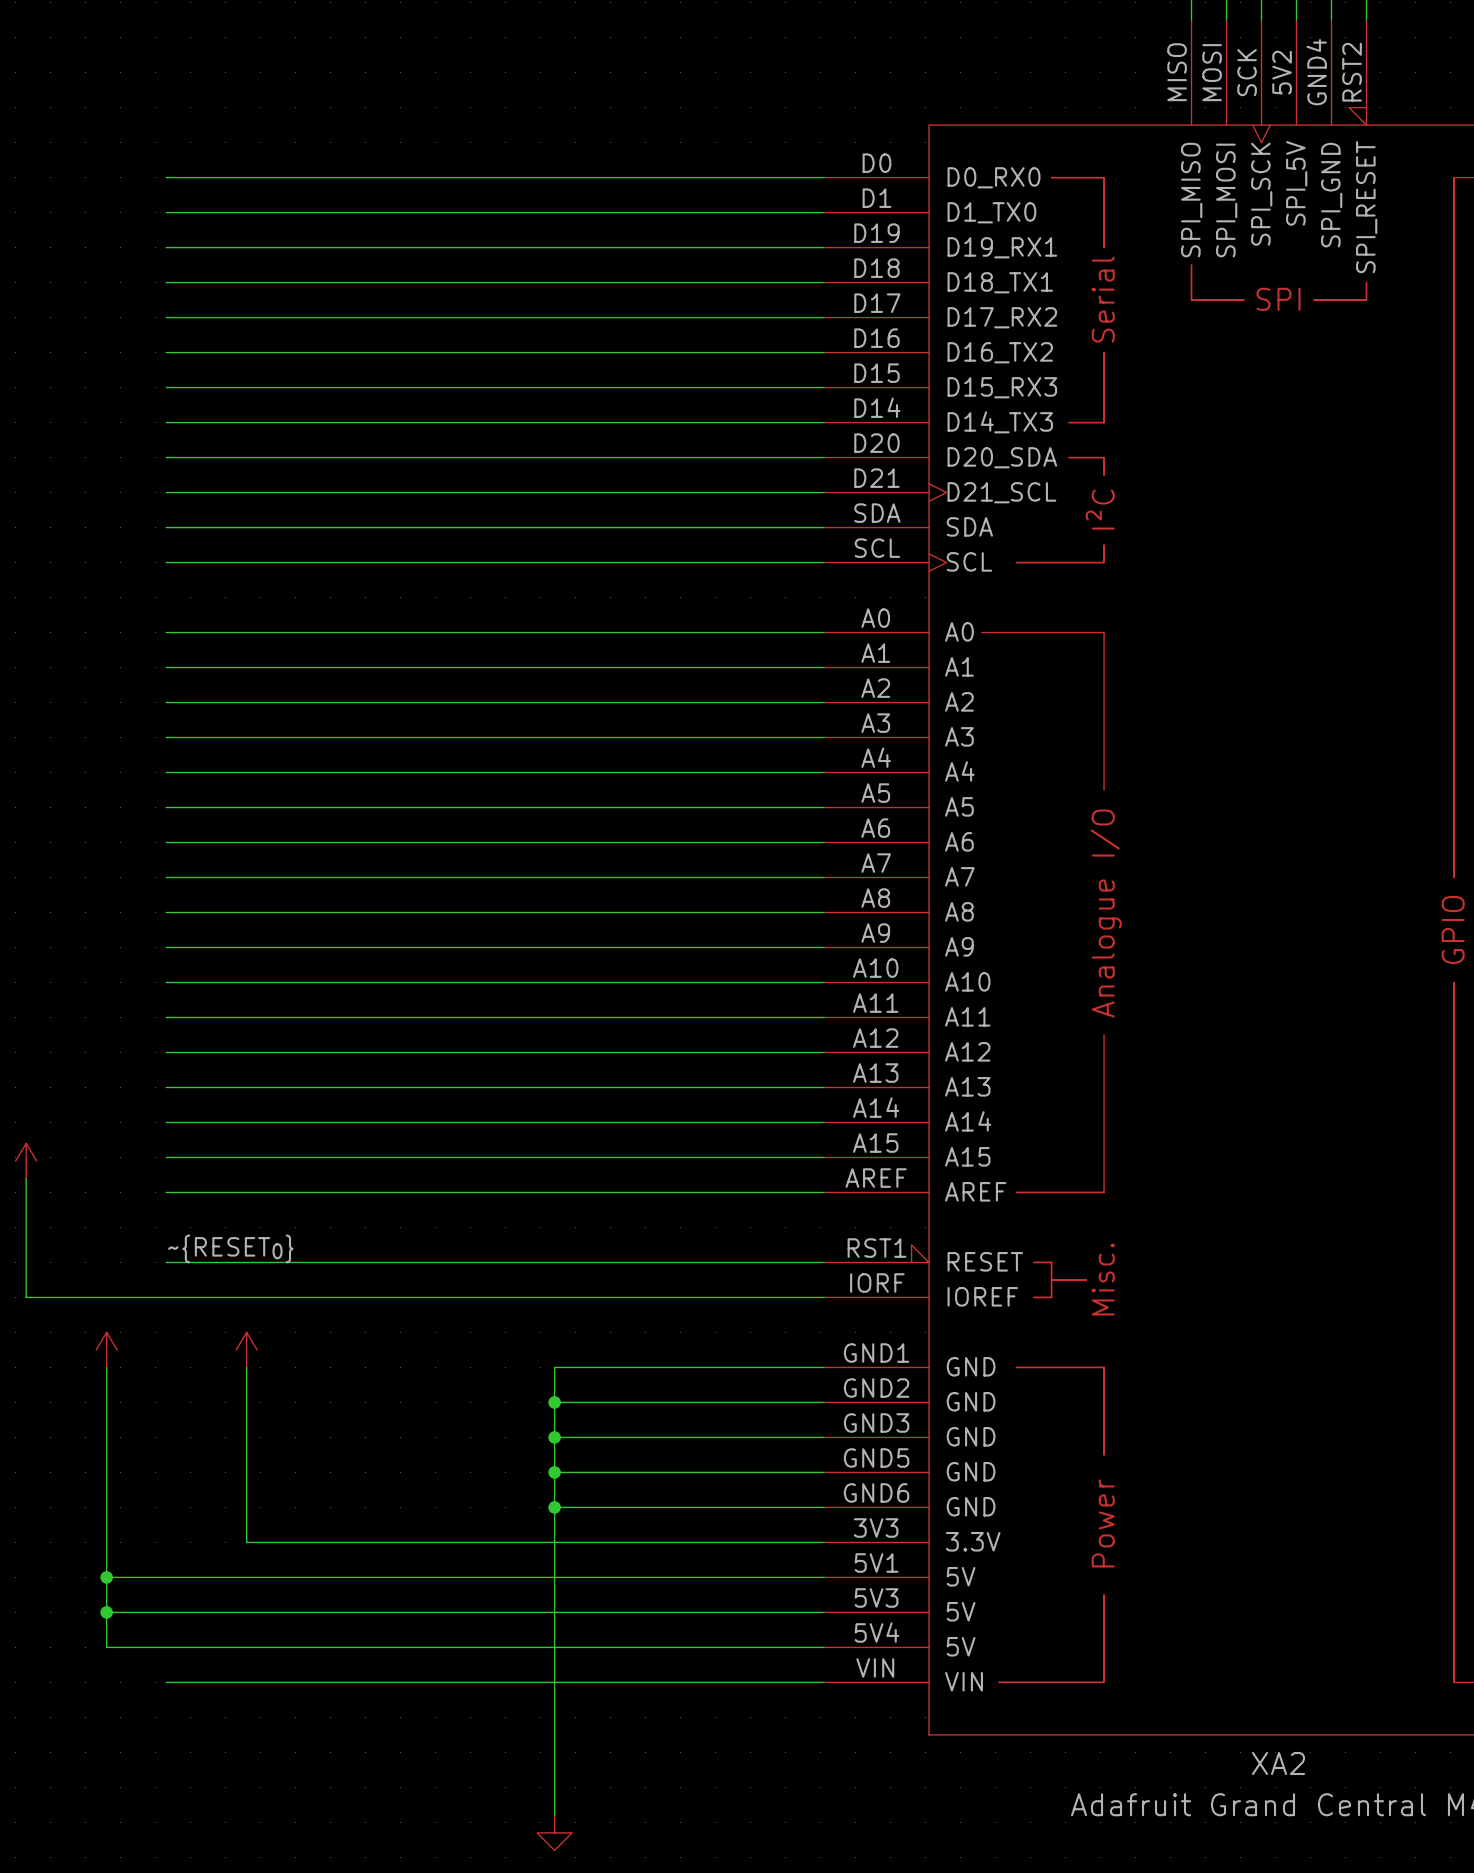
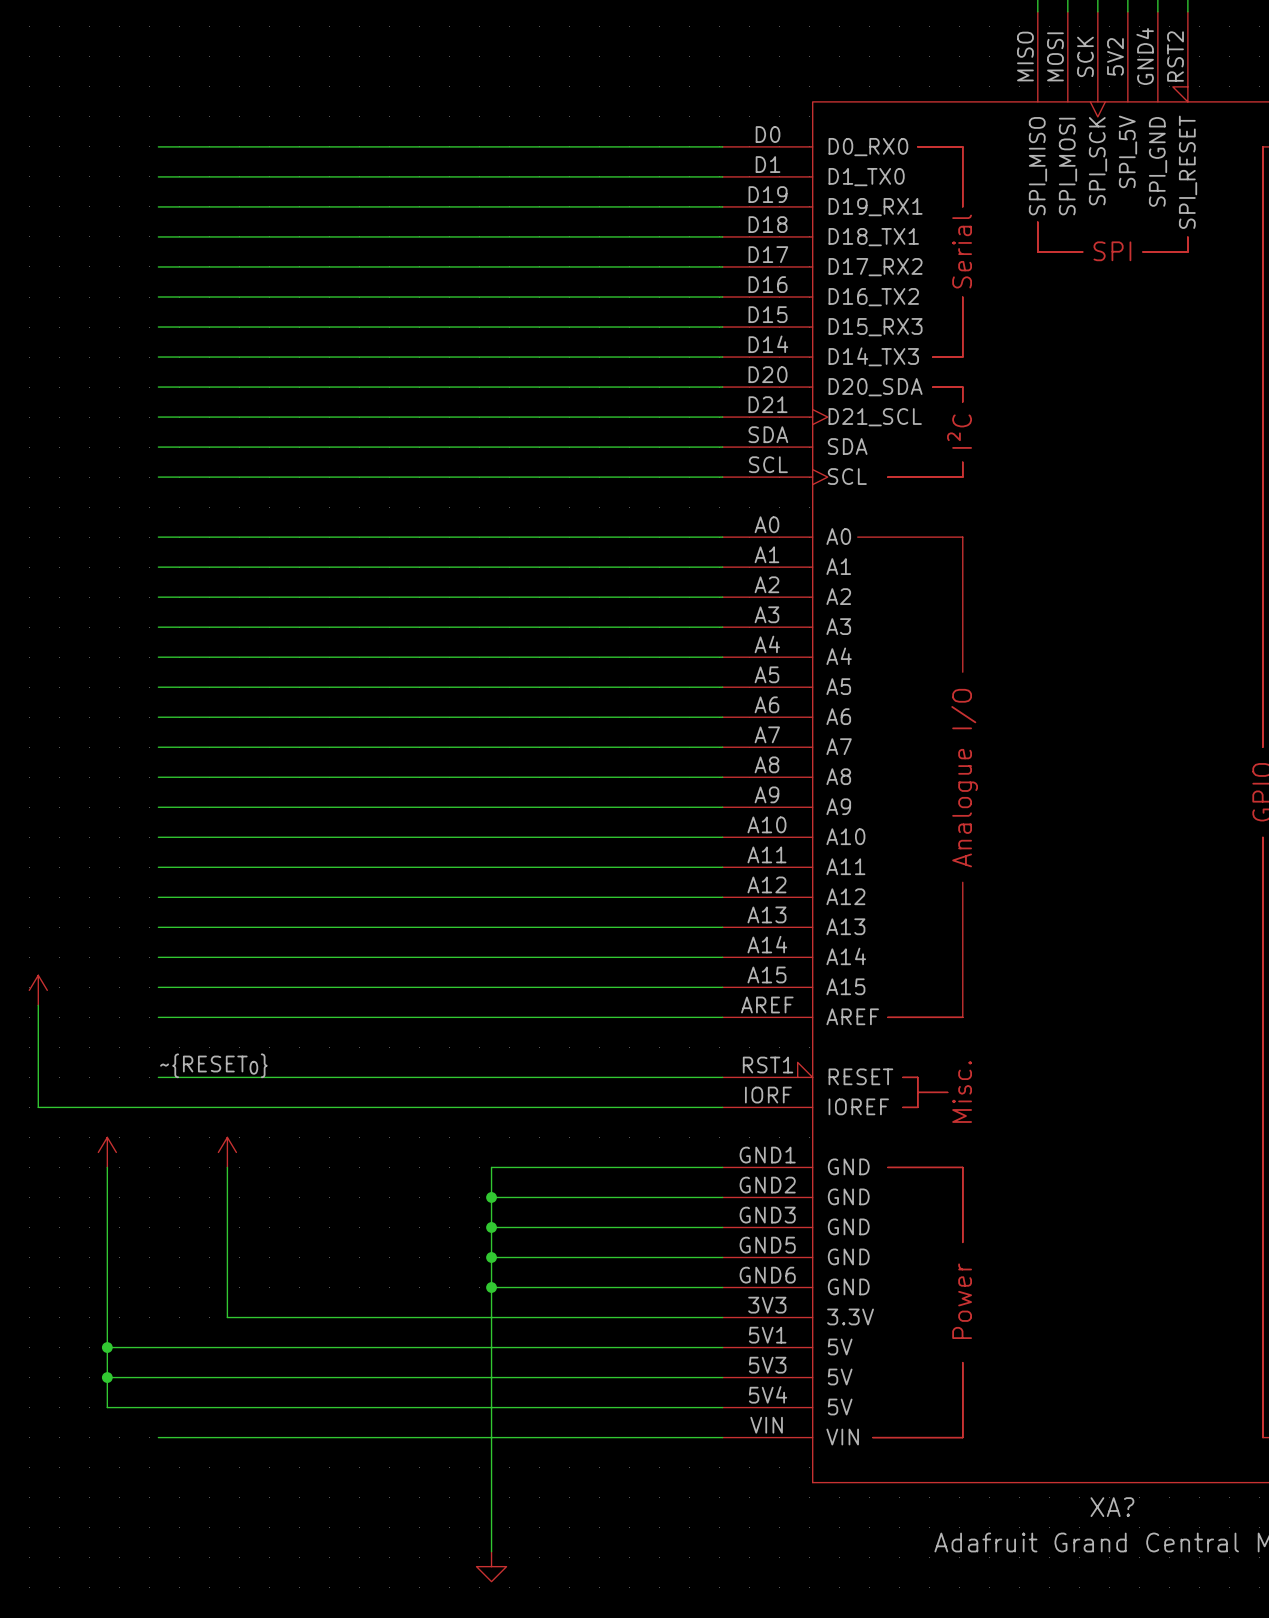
XA2 name: XA2 (1278, 1763) -> XA? (1112, 1507)

